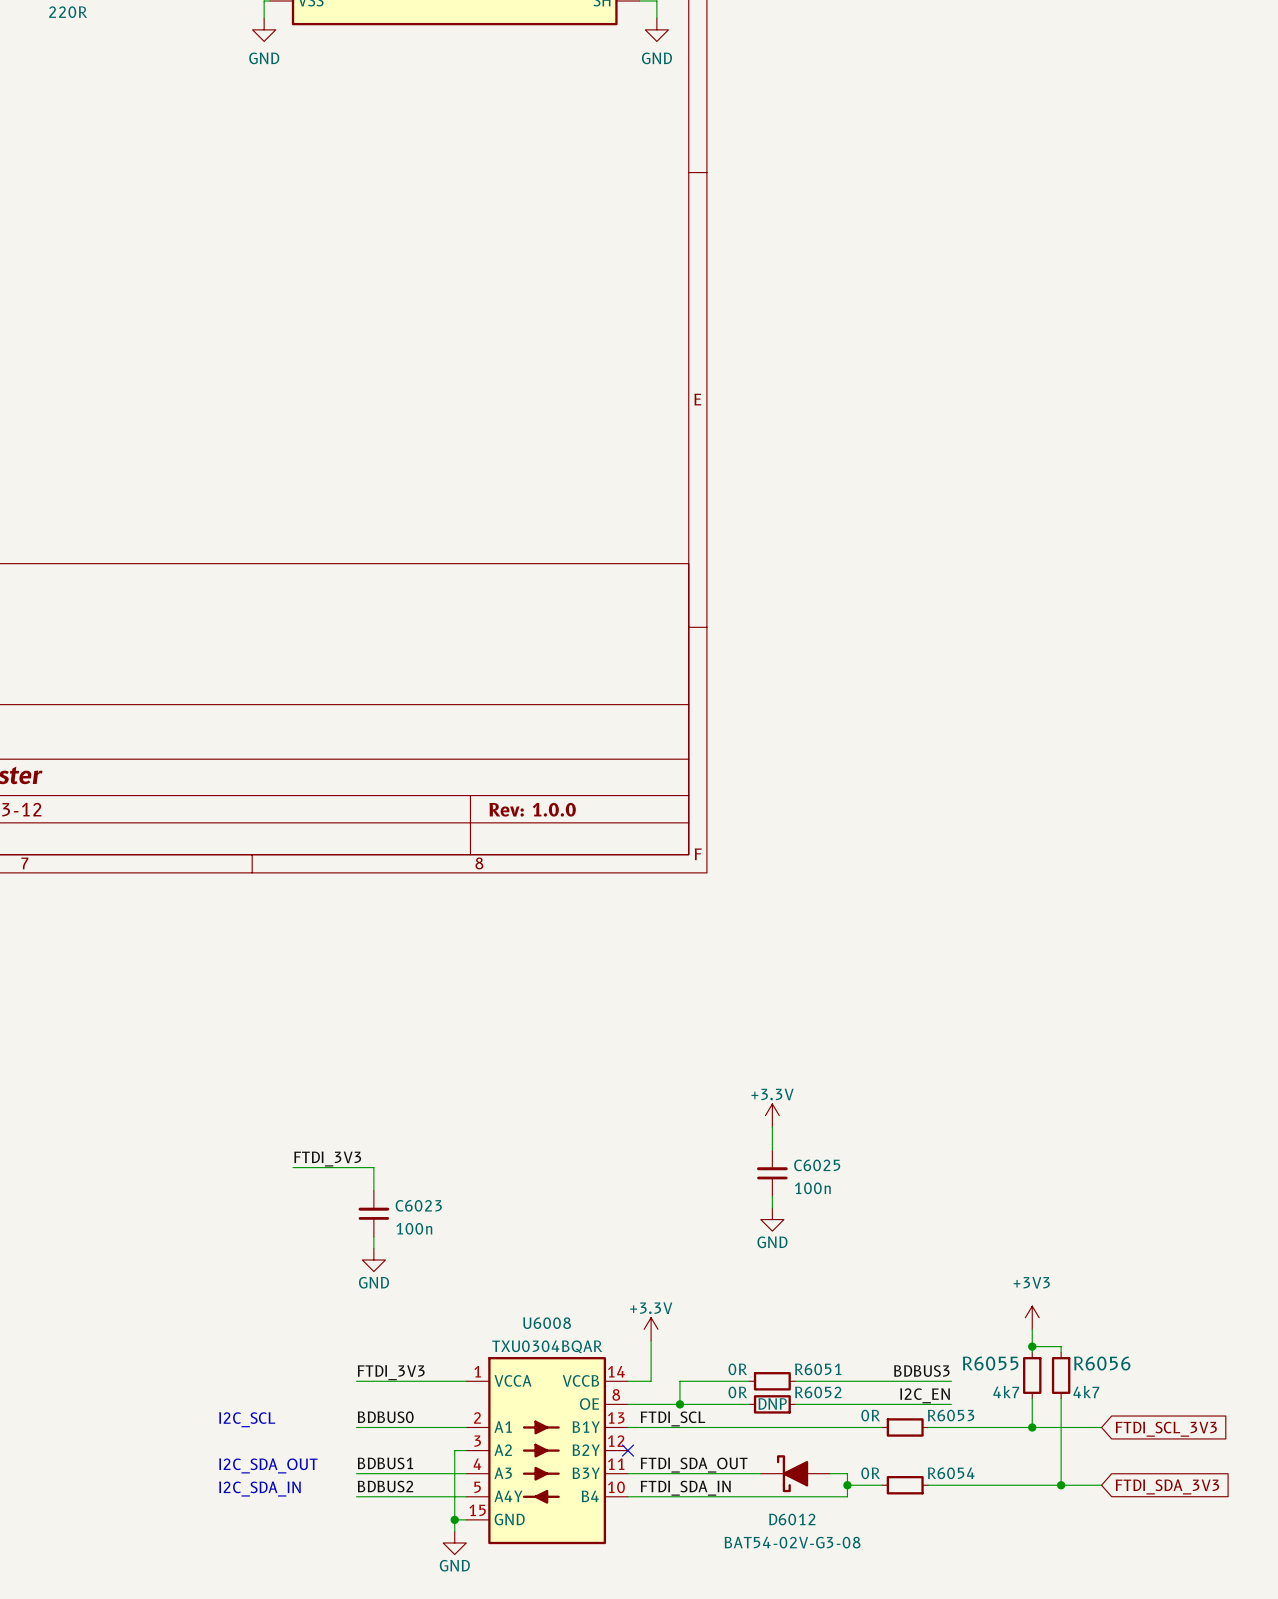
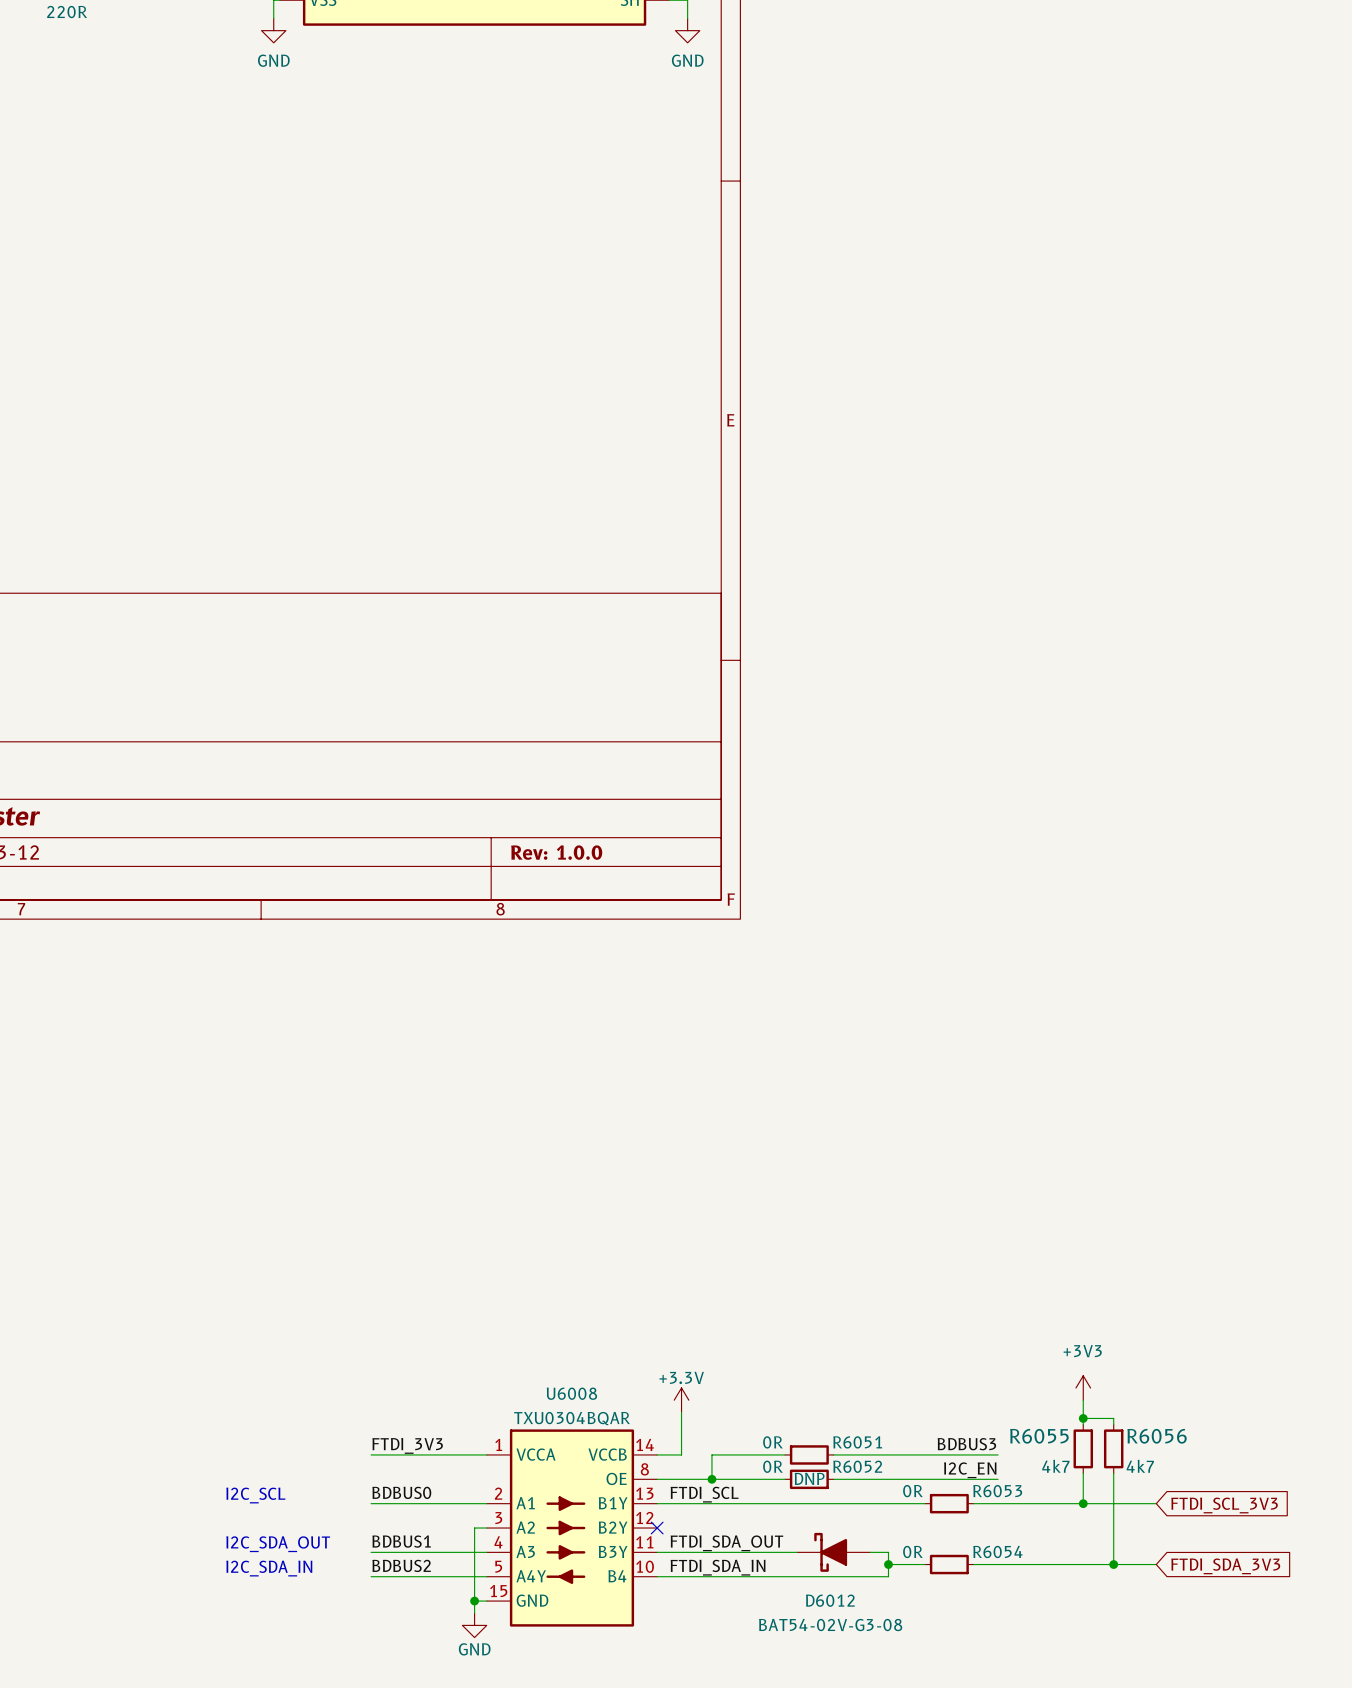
power symbol: +3.3V (772, 1115) -> none
wire: (772, 1127) (772, 1150) -> none
label: FTDI_3V3 (327, 1159) -> none
wire: (293, 1167) (373, 1167) (373, 1190) -> none
C6025: (772, 1173) -> none
wire: (772, 1196) (772, 1208) -> none
C6023: (373, 1213) -> none
power symbol: GND (772, 1219) -> none
wire: (373, 1236) (373, 1248) -> none
power symbol: GND (373, 1260) -> none

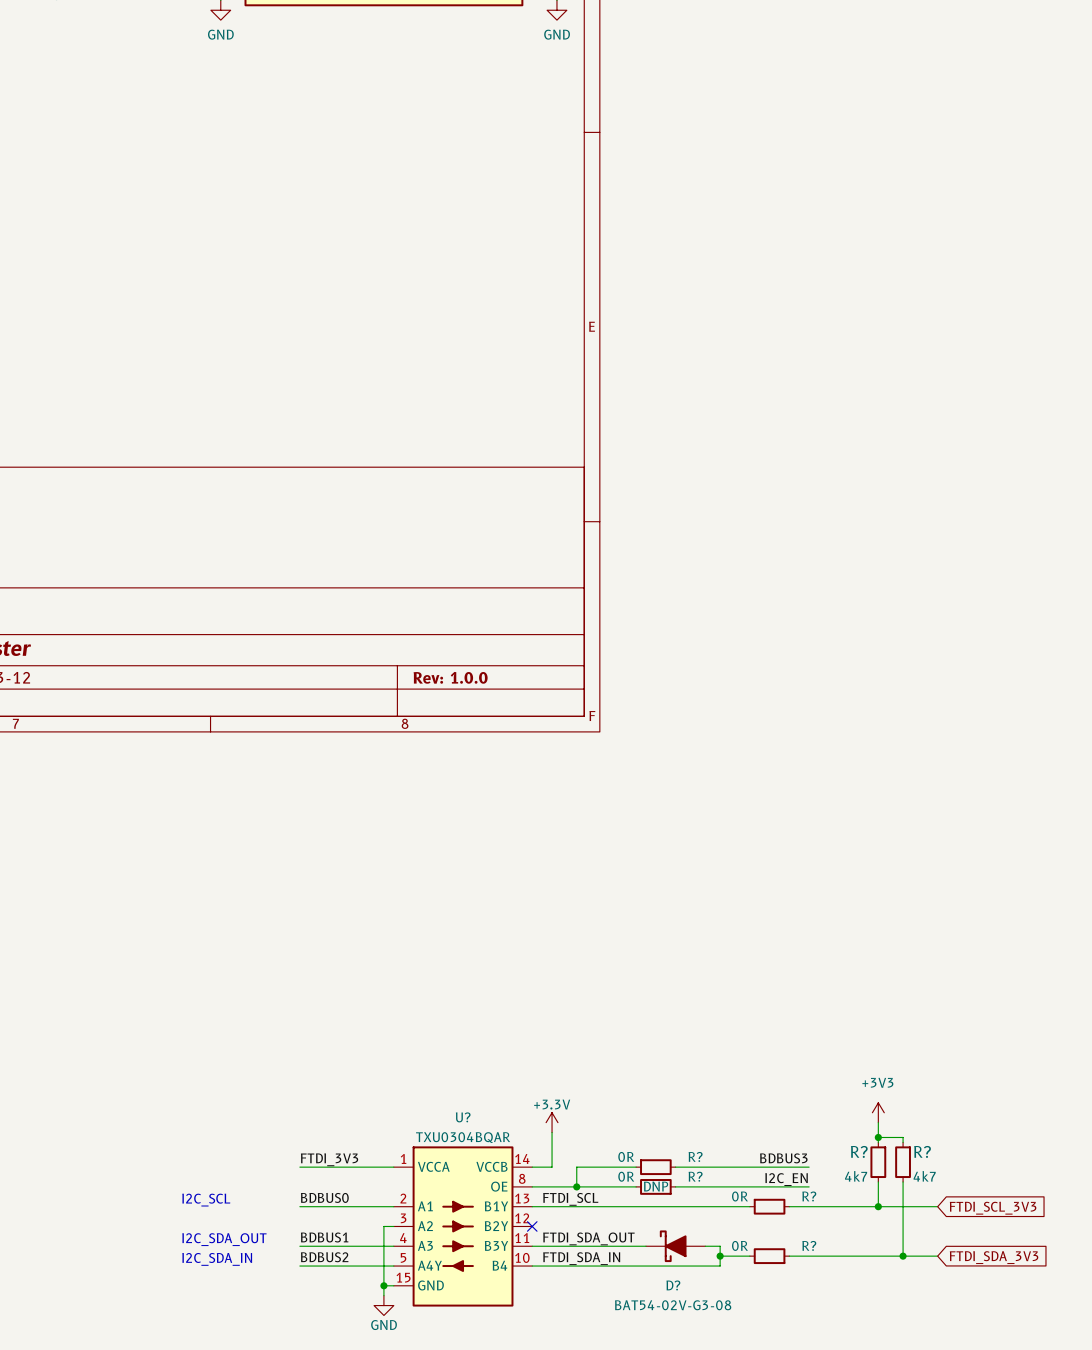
U6008 name: U6008 (571, 1393) -> U? (463, 1117)
R6055 name: R6055 (1039, 1436) -> R? (859, 1151)
R6056 name: R6056 (1157, 1436) -> R? (922, 1151)
R6051 name: R6051 (857, 1442) -> R? (695, 1156)
R6052 name: R6052 (857, 1466) -> R? (695, 1176)
R6053 name: R6053 (997, 1491) -> R? (809, 1196)
R6054 name: R6054 (997, 1551) -> R? (809, 1245)
D6012 name: D6012 (830, 1600) -> D? (673, 1285)

